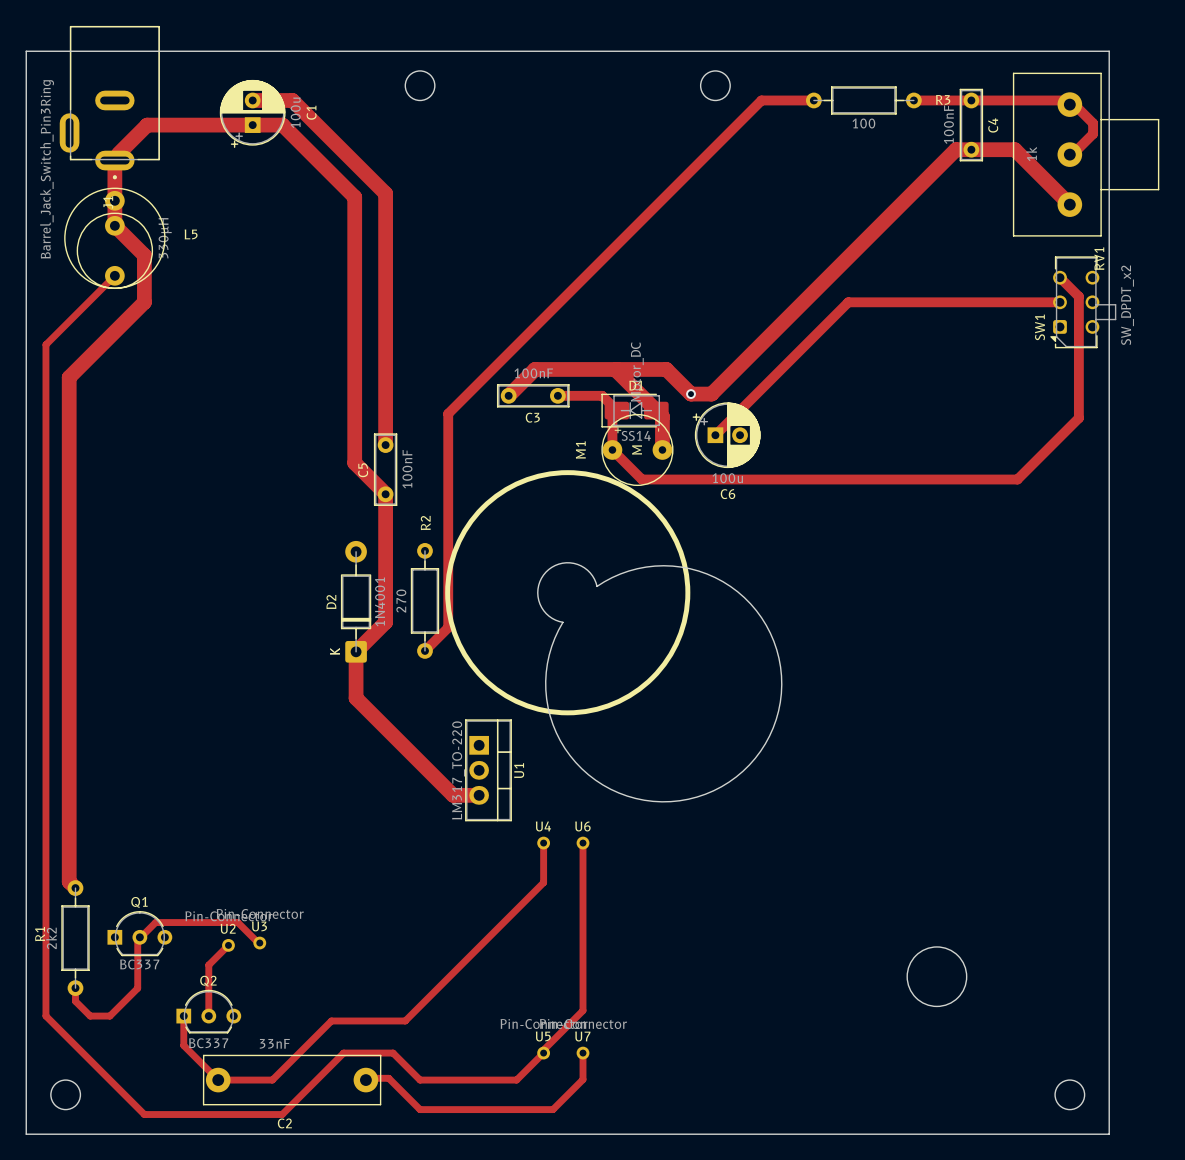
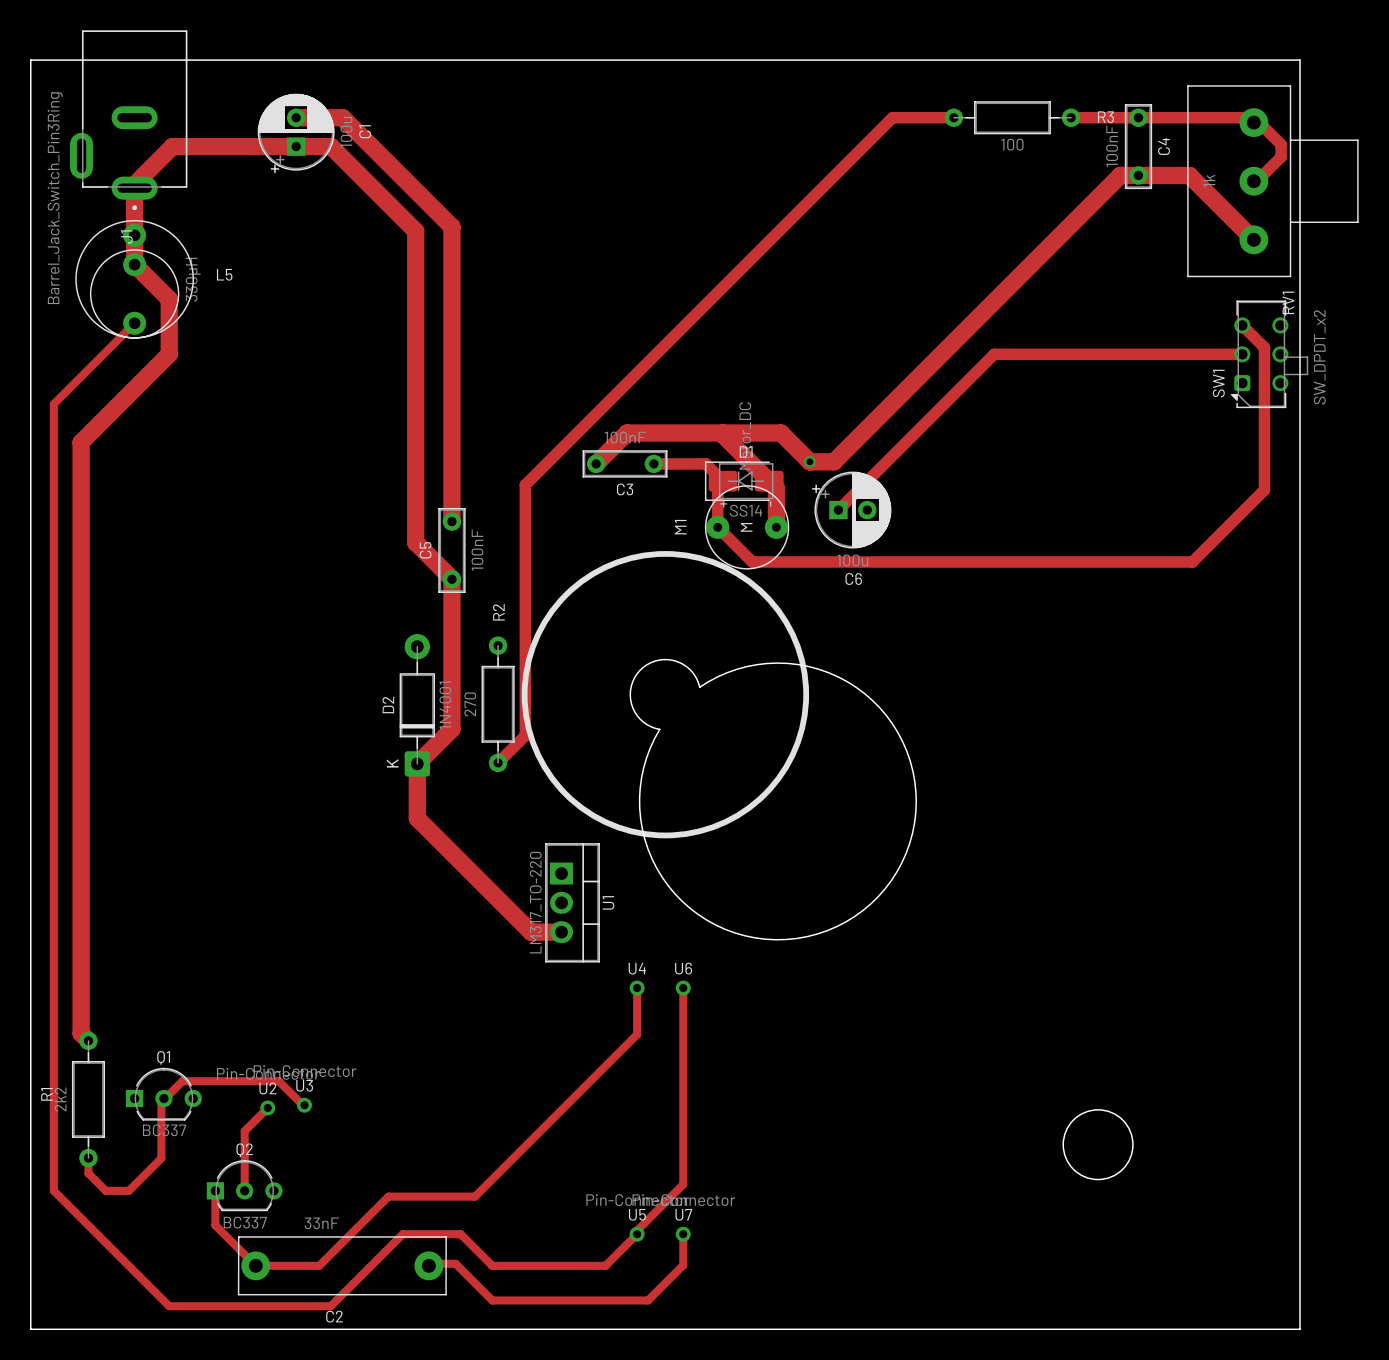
round board edge: [405, 70, 436, 101] -> none
round board edge: [700, 70, 731, 101] -> none
round board edge: [50, 1079, 81, 1110] -> none
round board edge: [1054, 1079, 1085, 1110] -> none

